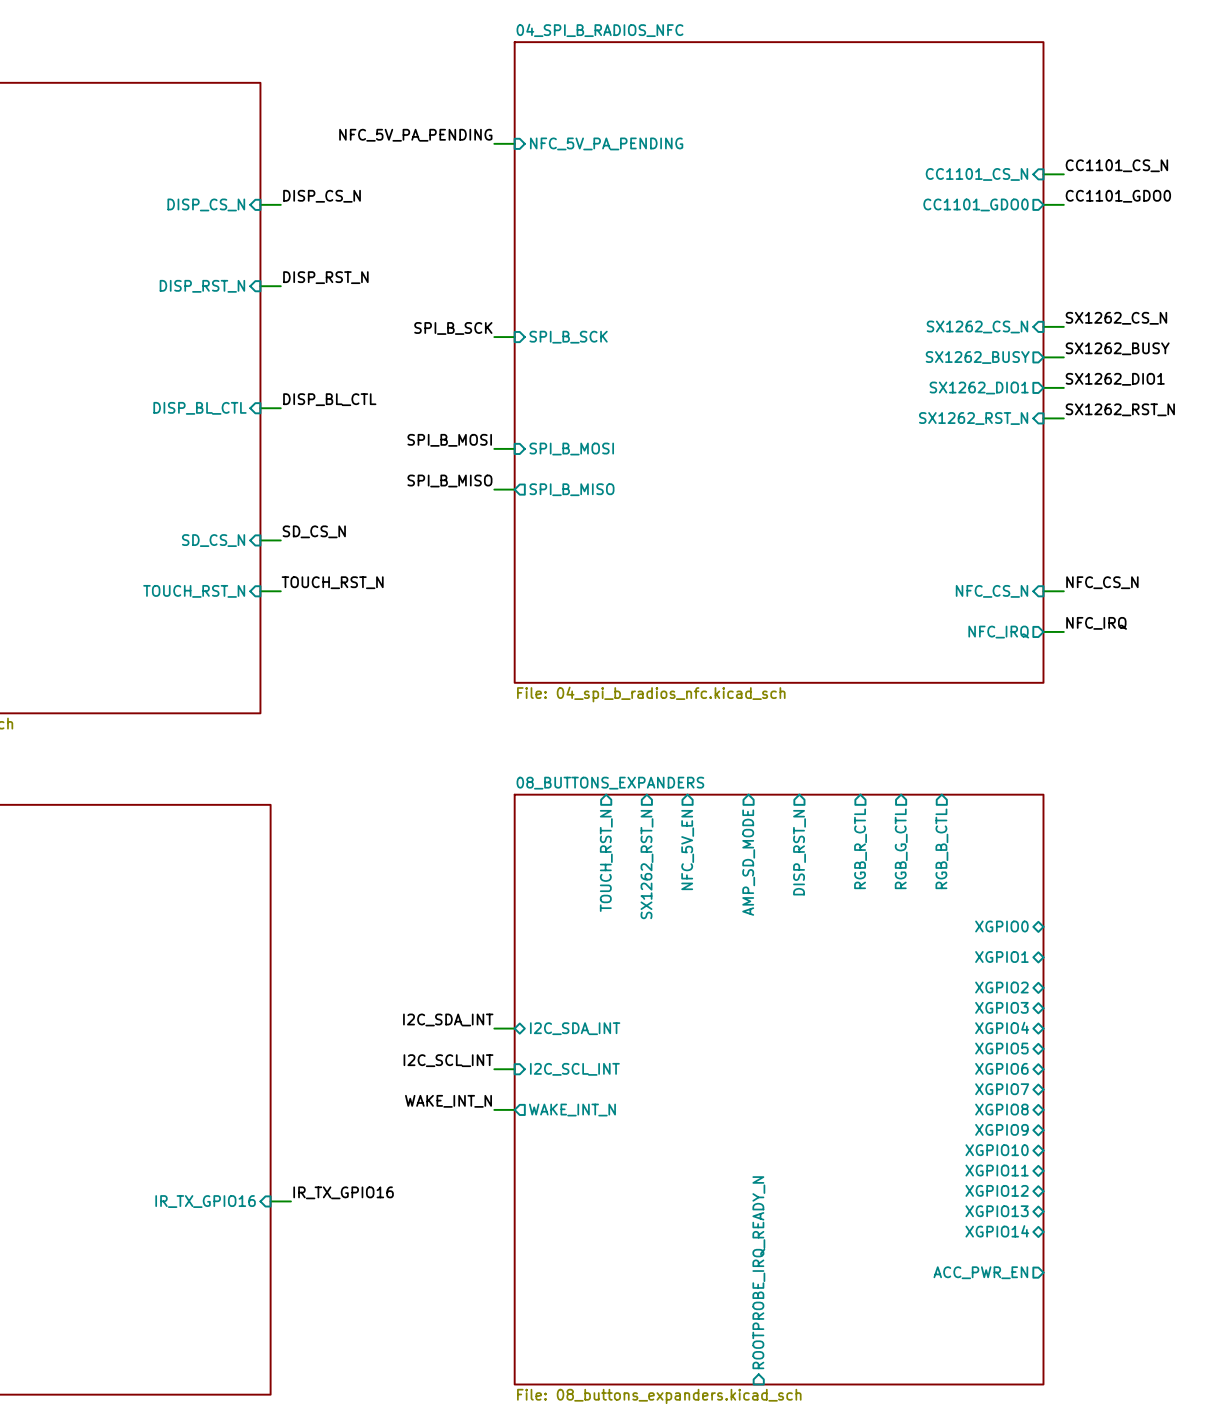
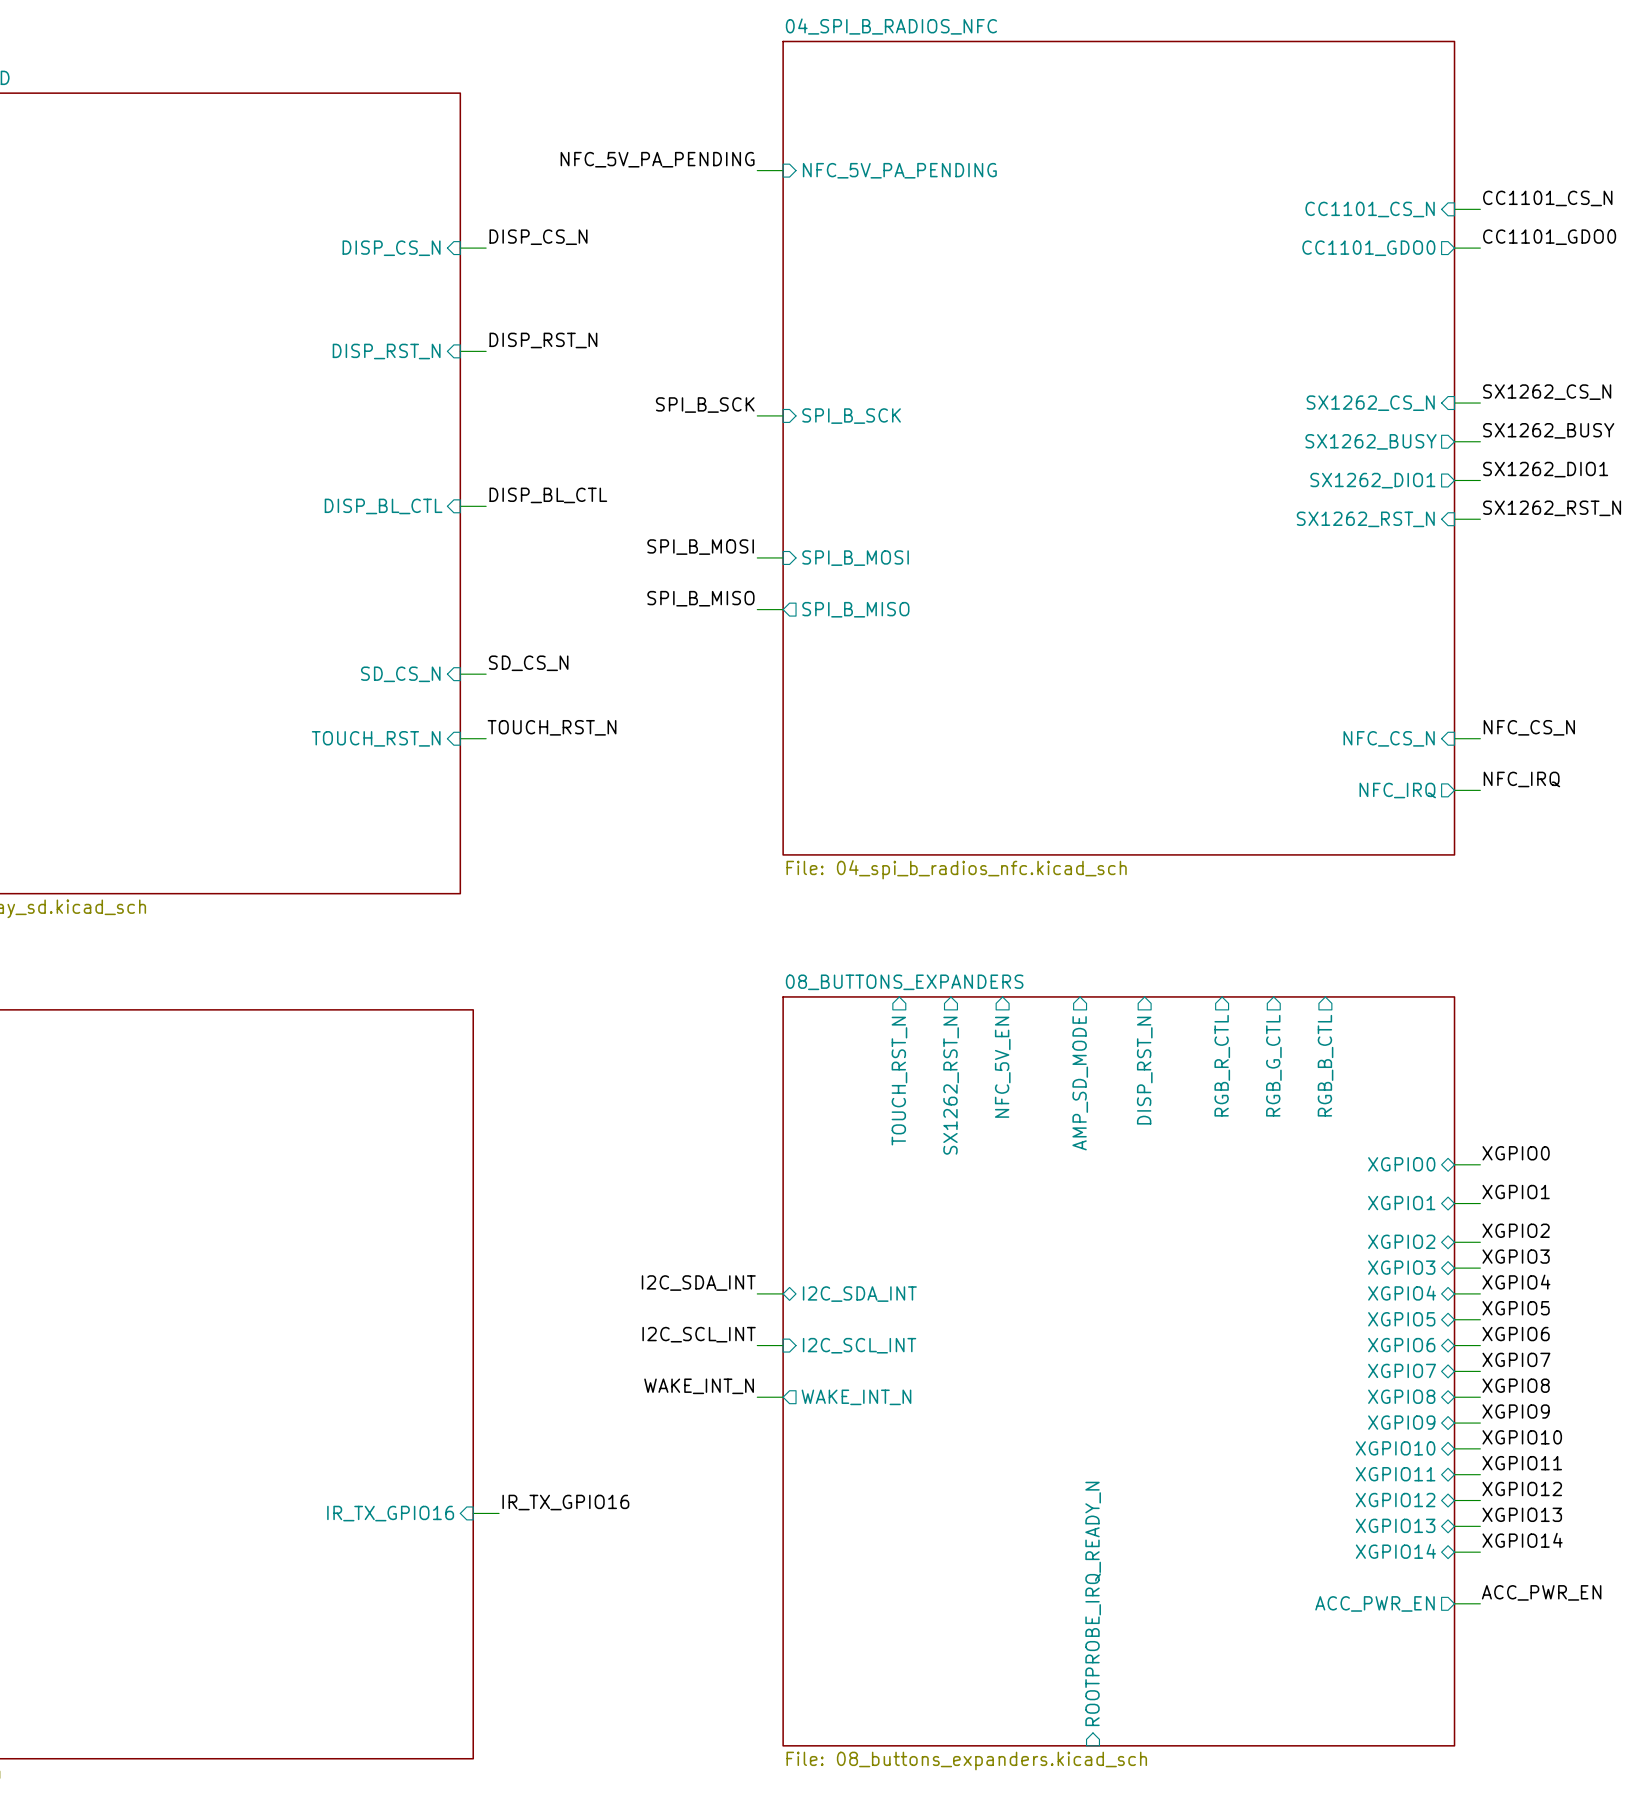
label: none -> XGPIO0 (1516, 1153)
wire: none -> (1454, 1164) (1480, 1164)
label: none -> XGPIO1 (1516, 1192)
wire: none -> (1454, 1203) (1480, 1203)
label: none -> XGPIO2 (1516, 1230)
wire: none -> (1454, 1242) (1480, 1242)
label: none -> XGPIO3 (1516, 1256)
wire: none -> (1454, 1268) (1480, 1268)
label: none -> XGPIO4 (1516, 1282)
wire: none -> (1454, 1293) (1480, 1293)
label: none -> XGPIO5 (1516, 1308)
wire: none -> (1454, 1319) (1480, 1319)
label: none -> XGPIO6 (1516, 1334)
wire: none -> (1454, 1345) (1480, 1345)
label: none -> XGPIO7 (1516, 1359)
wire: none -> (1454, 1371) (1480, 1371)
label: none -> XGPIO8 (1516, 1385)
wire: none -> (1454, 1397) (1480, 1397)
label: none -> XGPIO9 (1516, 1411)
wire: none -> (1454, 1423) (1480, 1423)
label: none -> XGPIO10 (1522, 1437)
wire: none -> (1454, 1448) (1480, 1448)
label: none -> XGPIO11 (1522, 1463)
wire: none -> (1454, 1474) (1480, 1474)
label: none -> XGPIO12 (1522, 1488)
wire: none -> (1454, 1500) (1480, 1500)
label: none -> XGPIO13 (1522, 1514)
wire: none -> (1454, 1526) (1480, 1526)
label: none -> XGPIO14 (1522, 1540)
wire: none -> (1454, 1552) (1480, 1552)
label: none -> ACC_PWR_EN (1541, 1592)
wire: none -> (1454, 1603) (1480, 1603)

